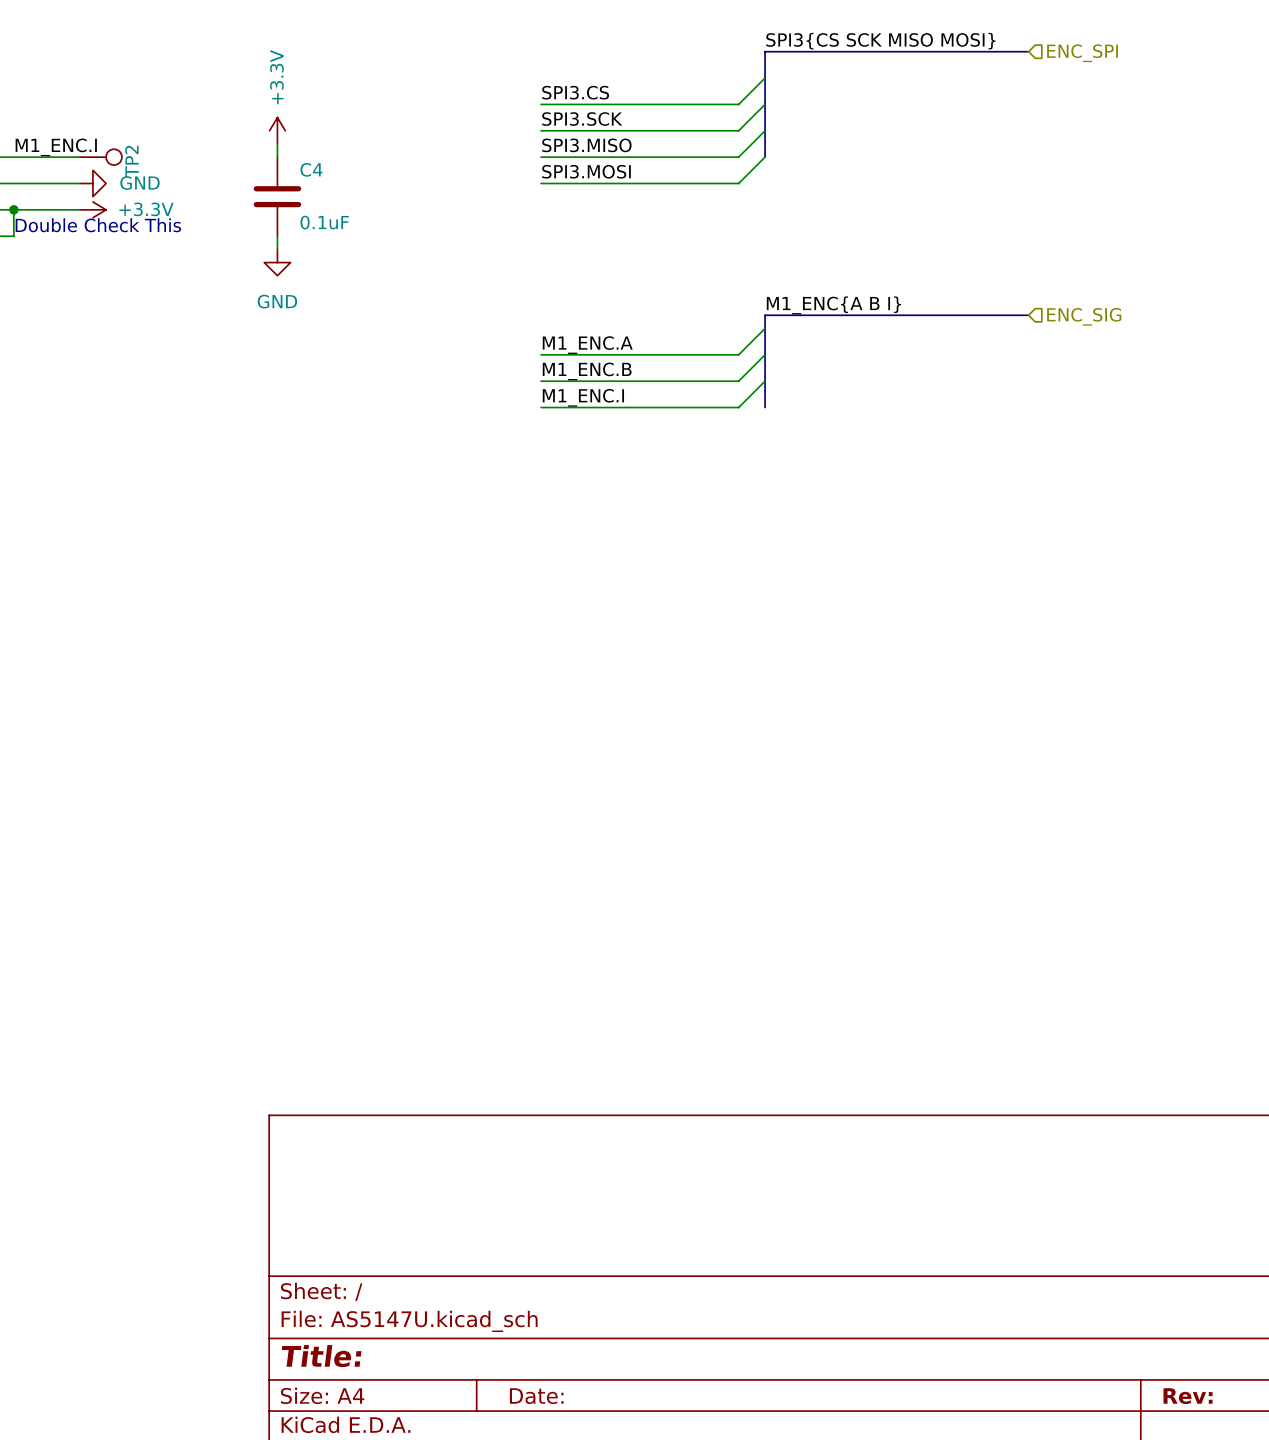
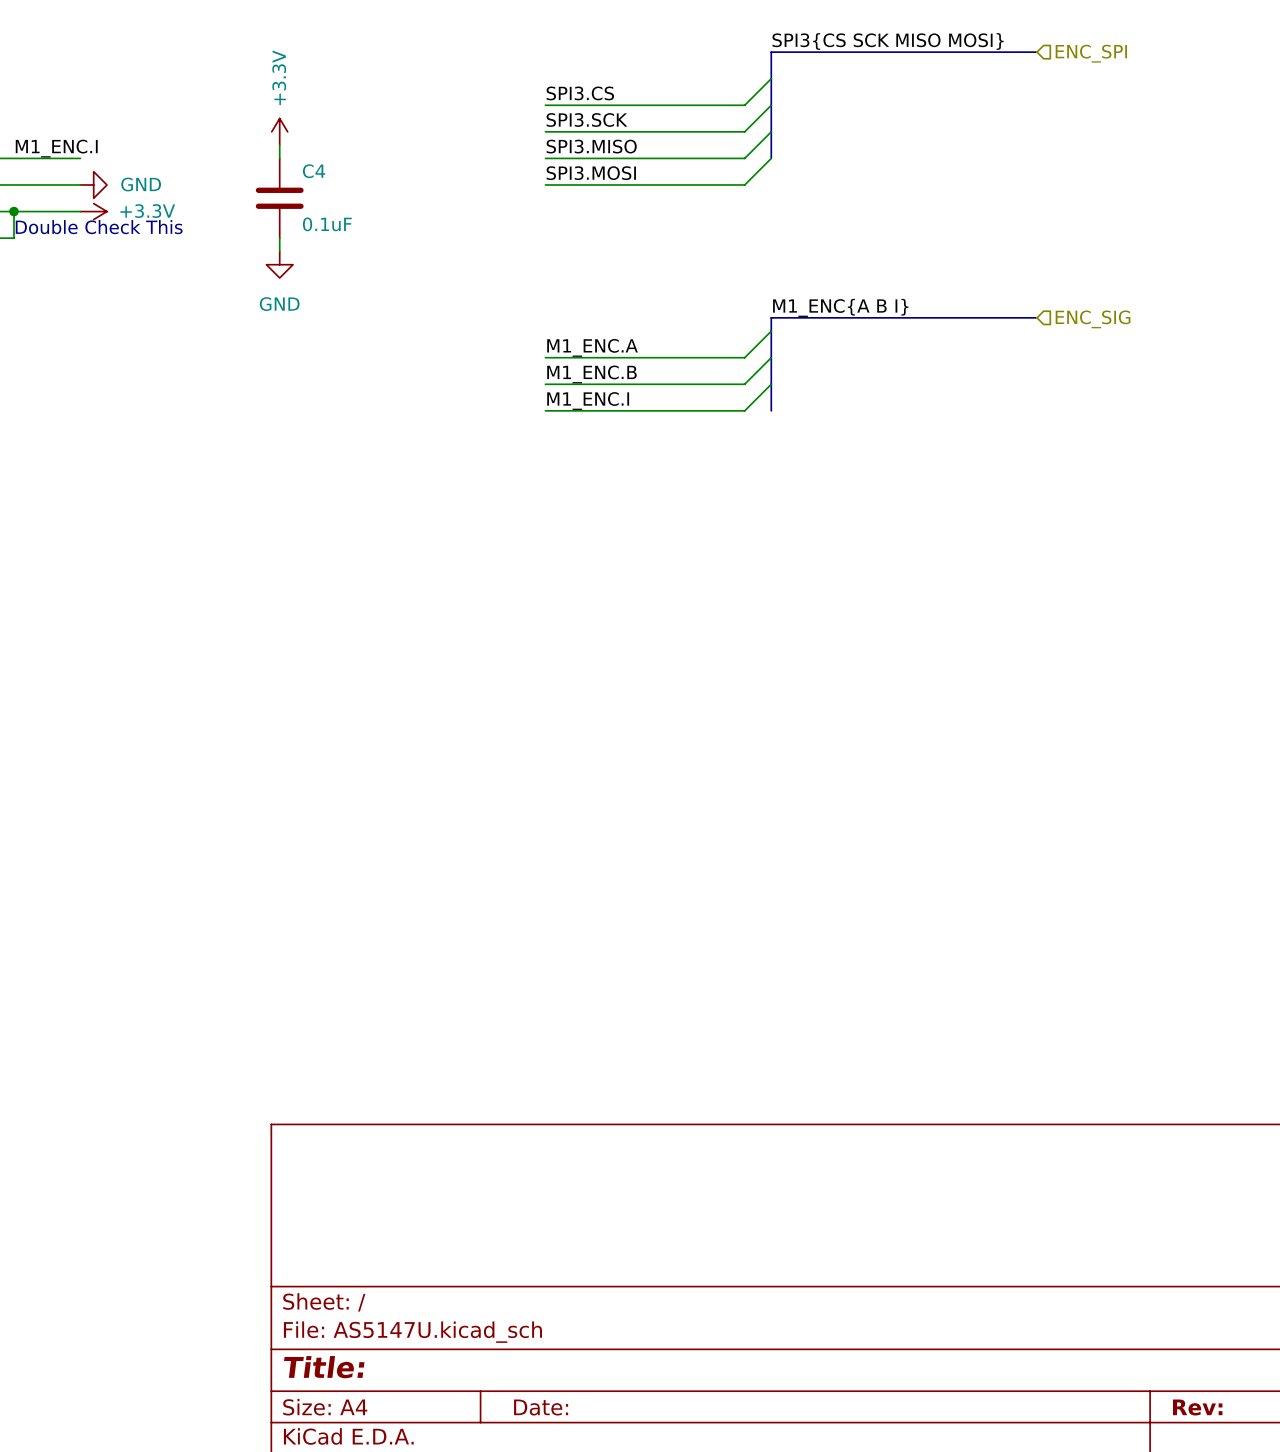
TP2: (100, 157) -> none

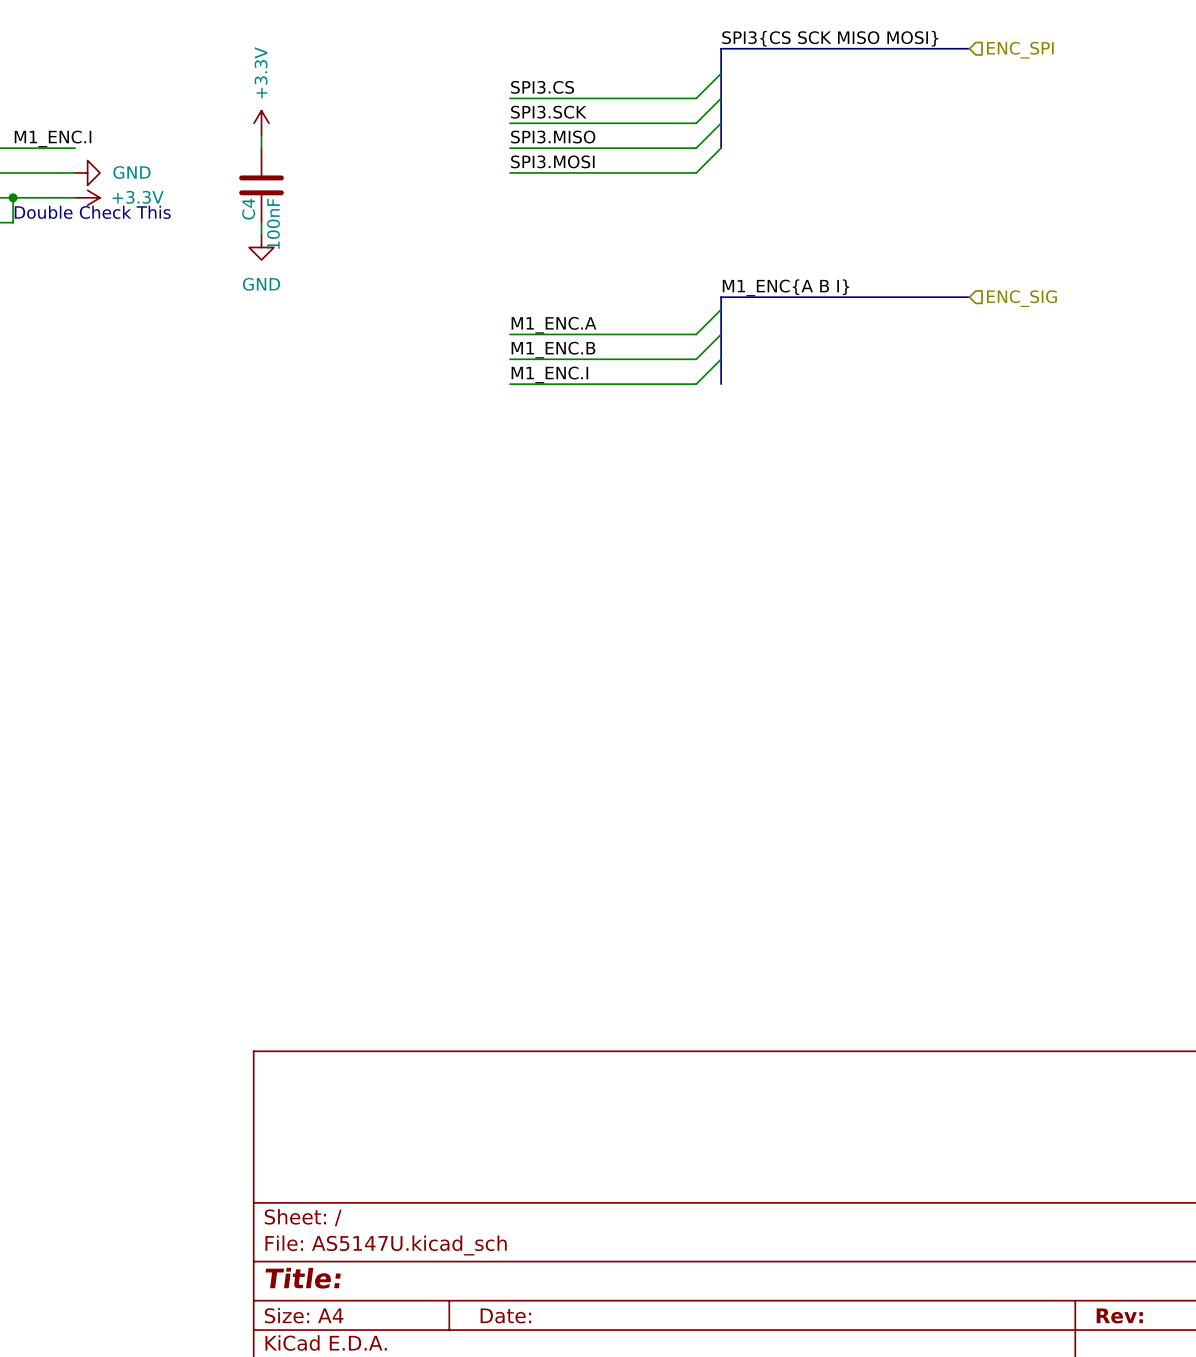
C4 name rotation: 0° (314, 171) -> 90° counterclockwise (248, 209)
C4 name position: C4 (314, 171) -> C4 (248, 209)
C4 value: 0.1uF (327, 224) -> 100nF (273, 223)

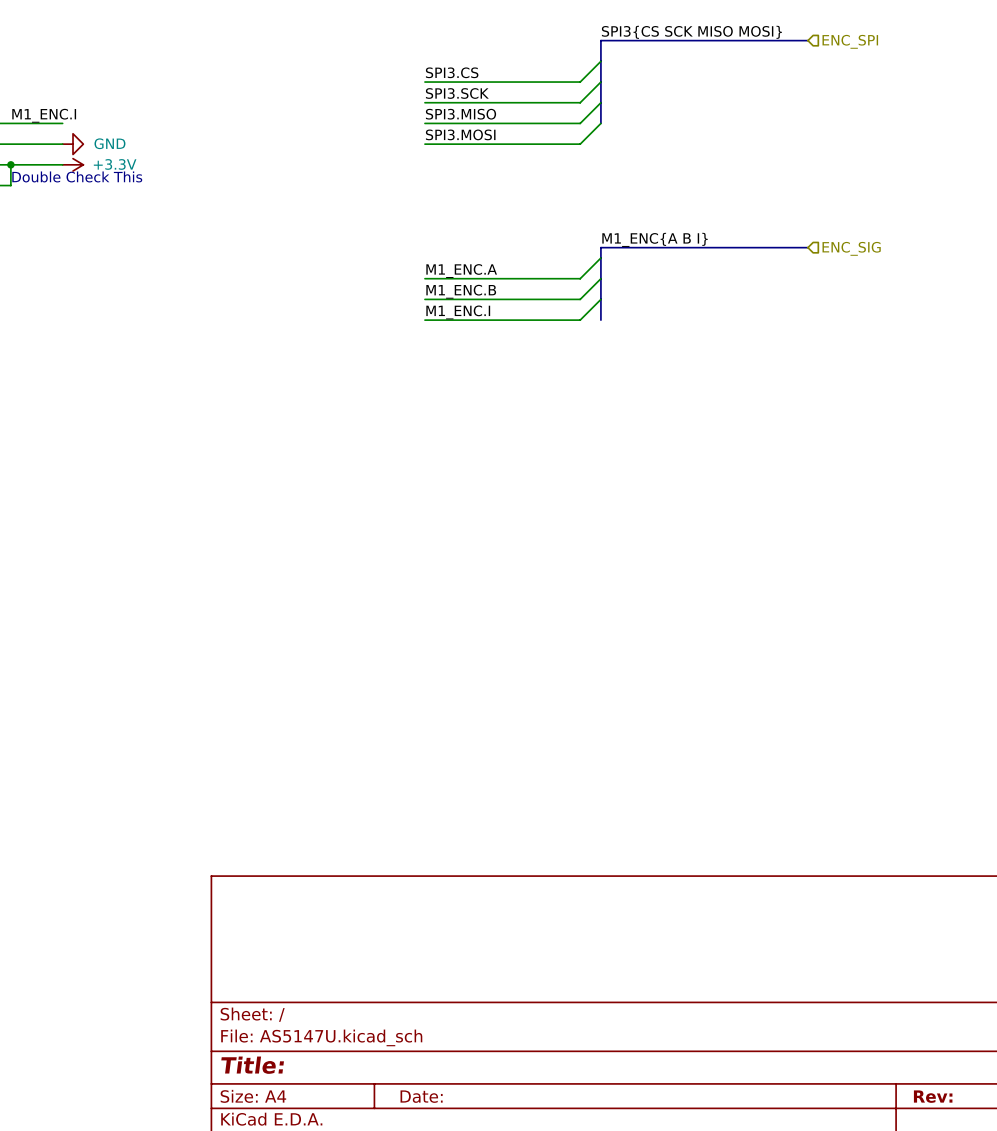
power symbol: +3.3V (261, 123) -> none
wire: (261, 135) (261, 148) -> none
C4: 100nF (261, 185) -> none
wire: (261, 222) (261, 235) -> none
power symbol: GND (261, 247) -> none

